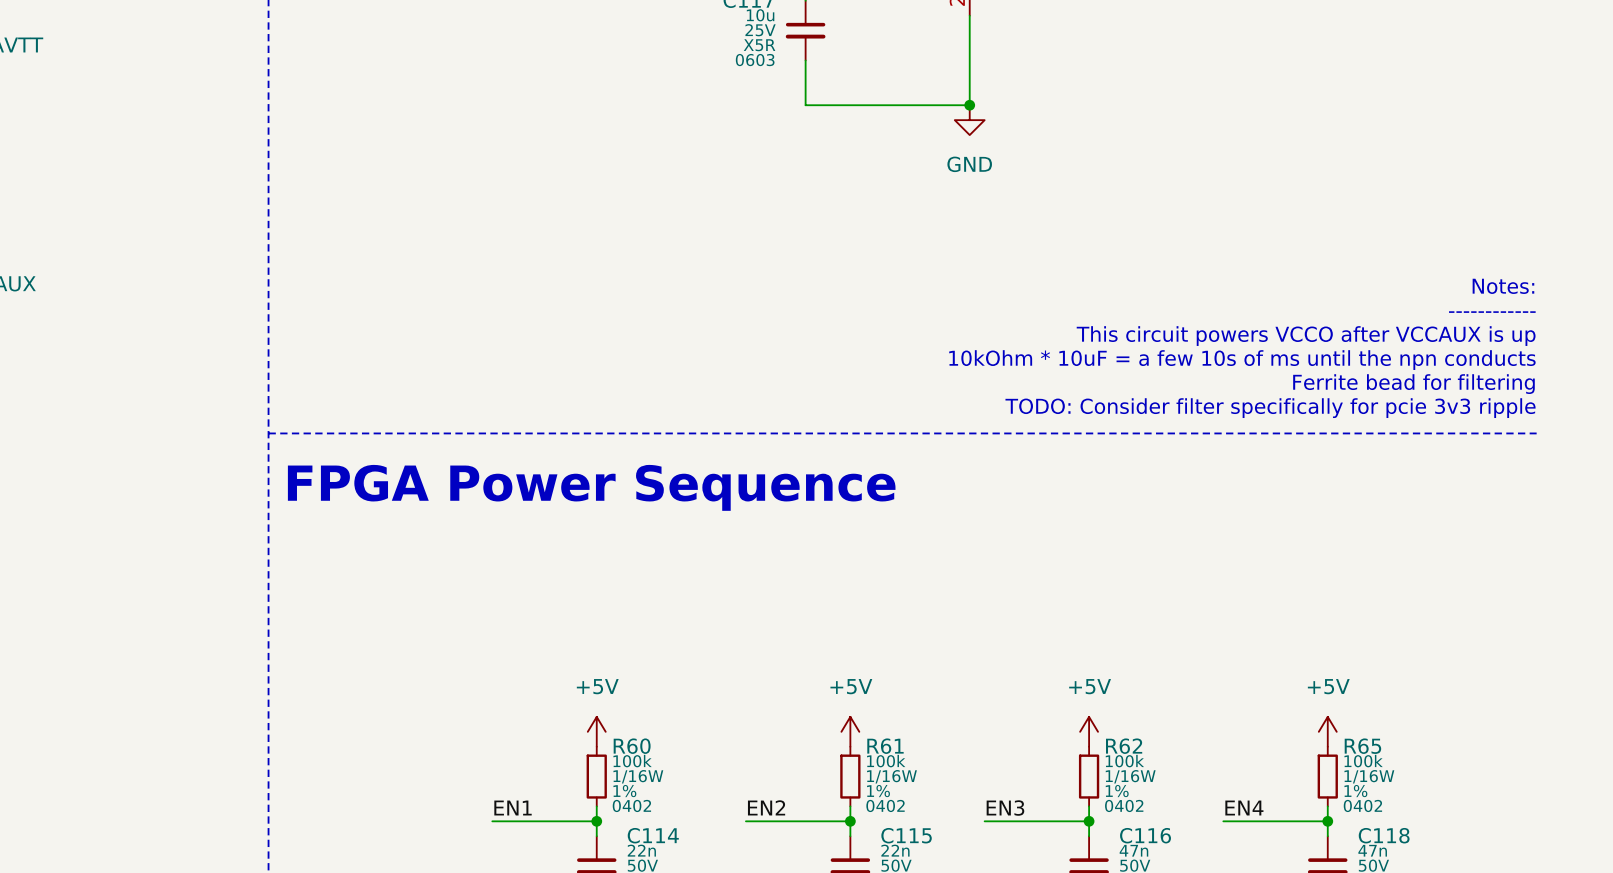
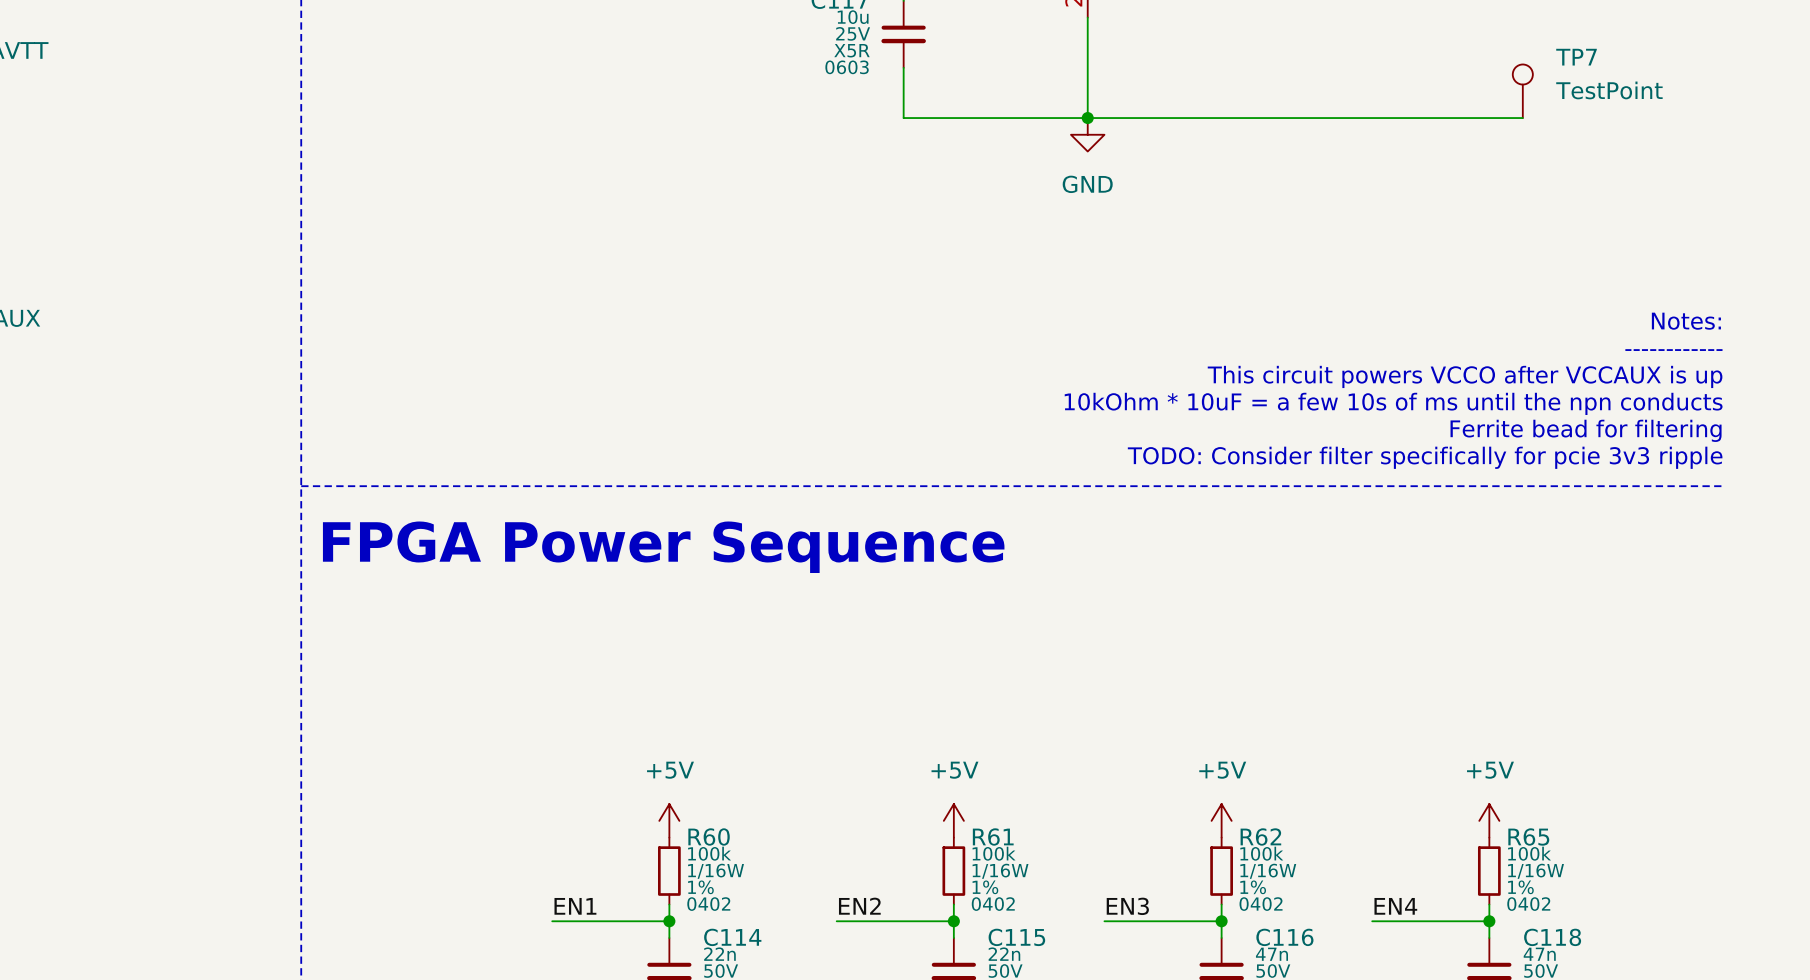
TP7: none -> TestPoint (1522, 91)
wire: none -> (1087, 118) (1522, 118)

